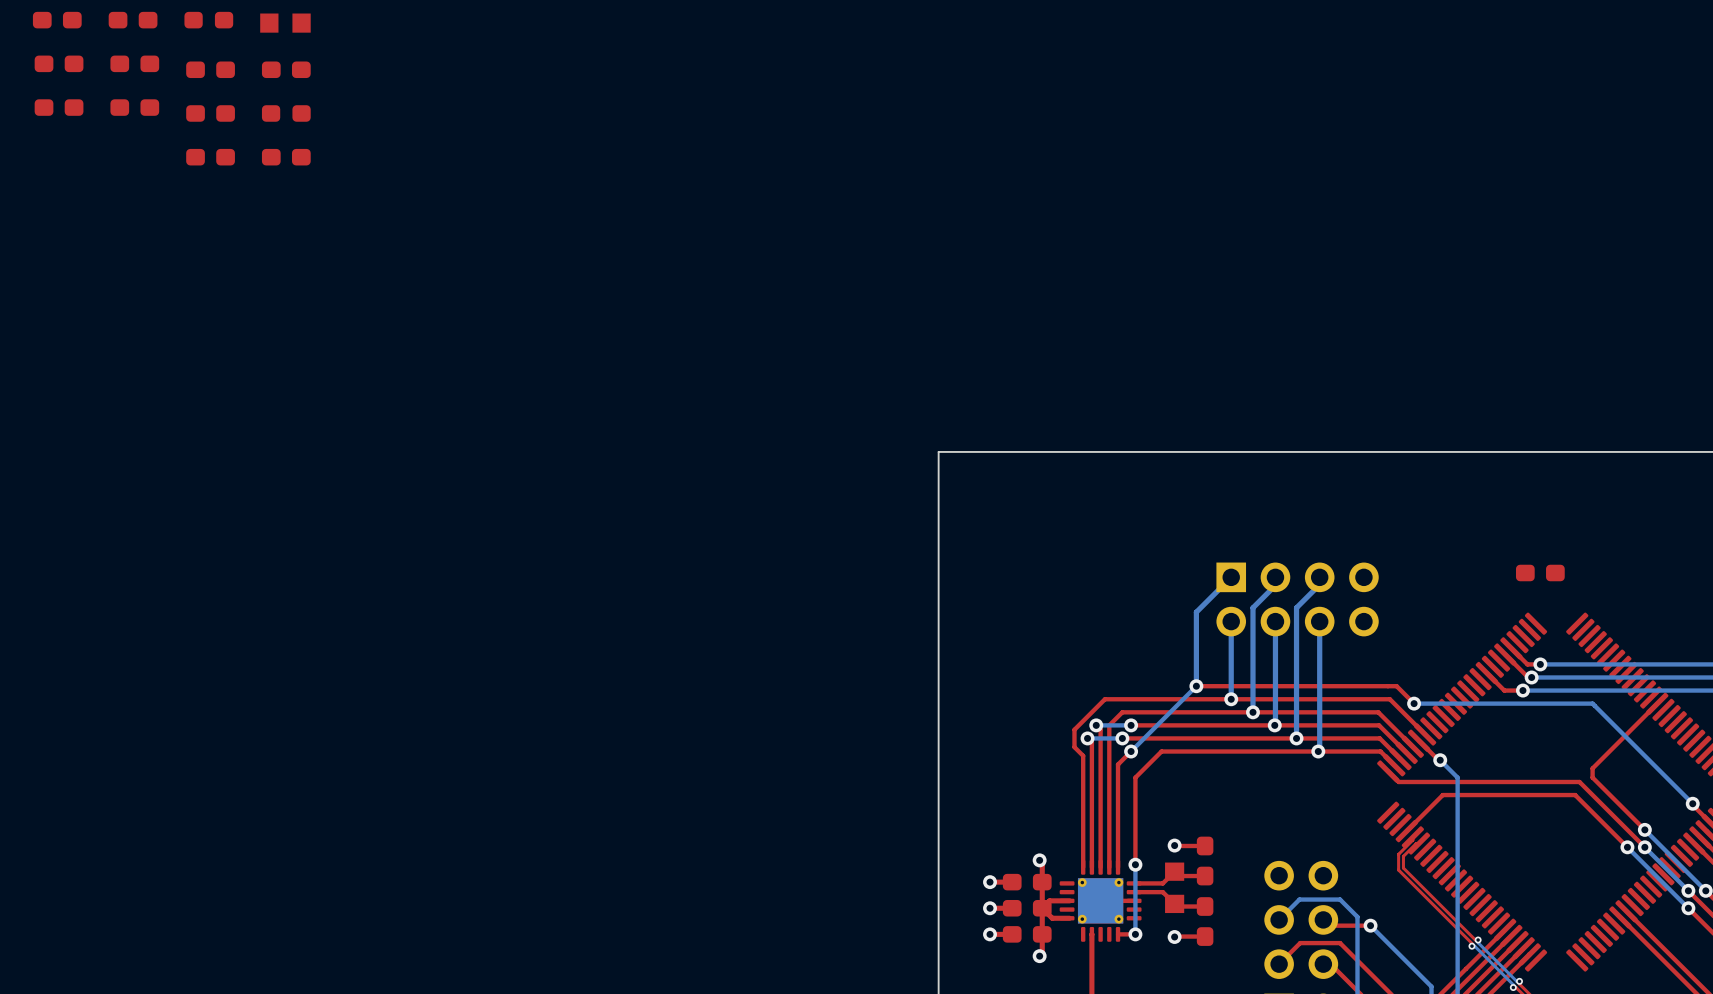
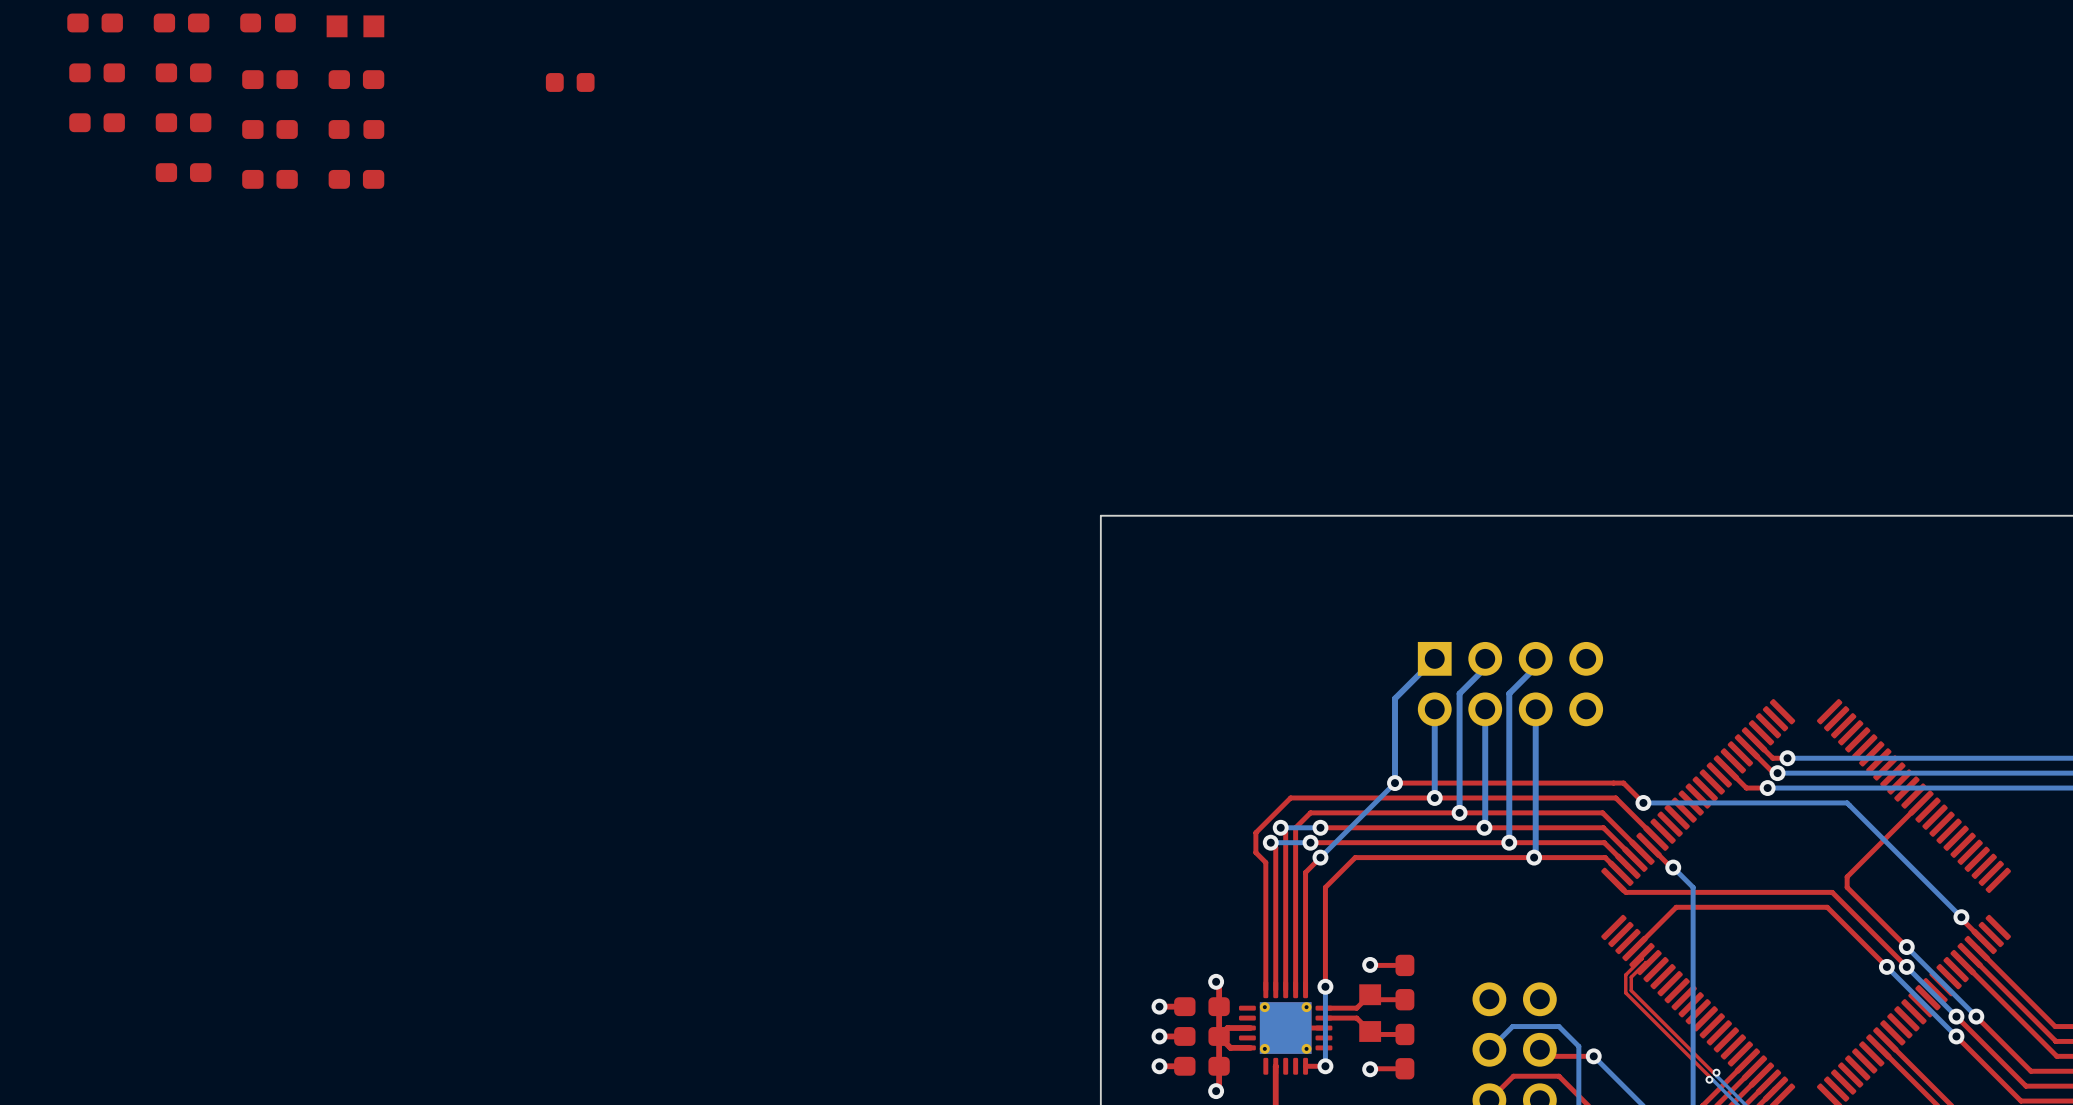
part: none -> (570, 82)
part: none -> (183, 172)
part: (1540, 573) -> none

